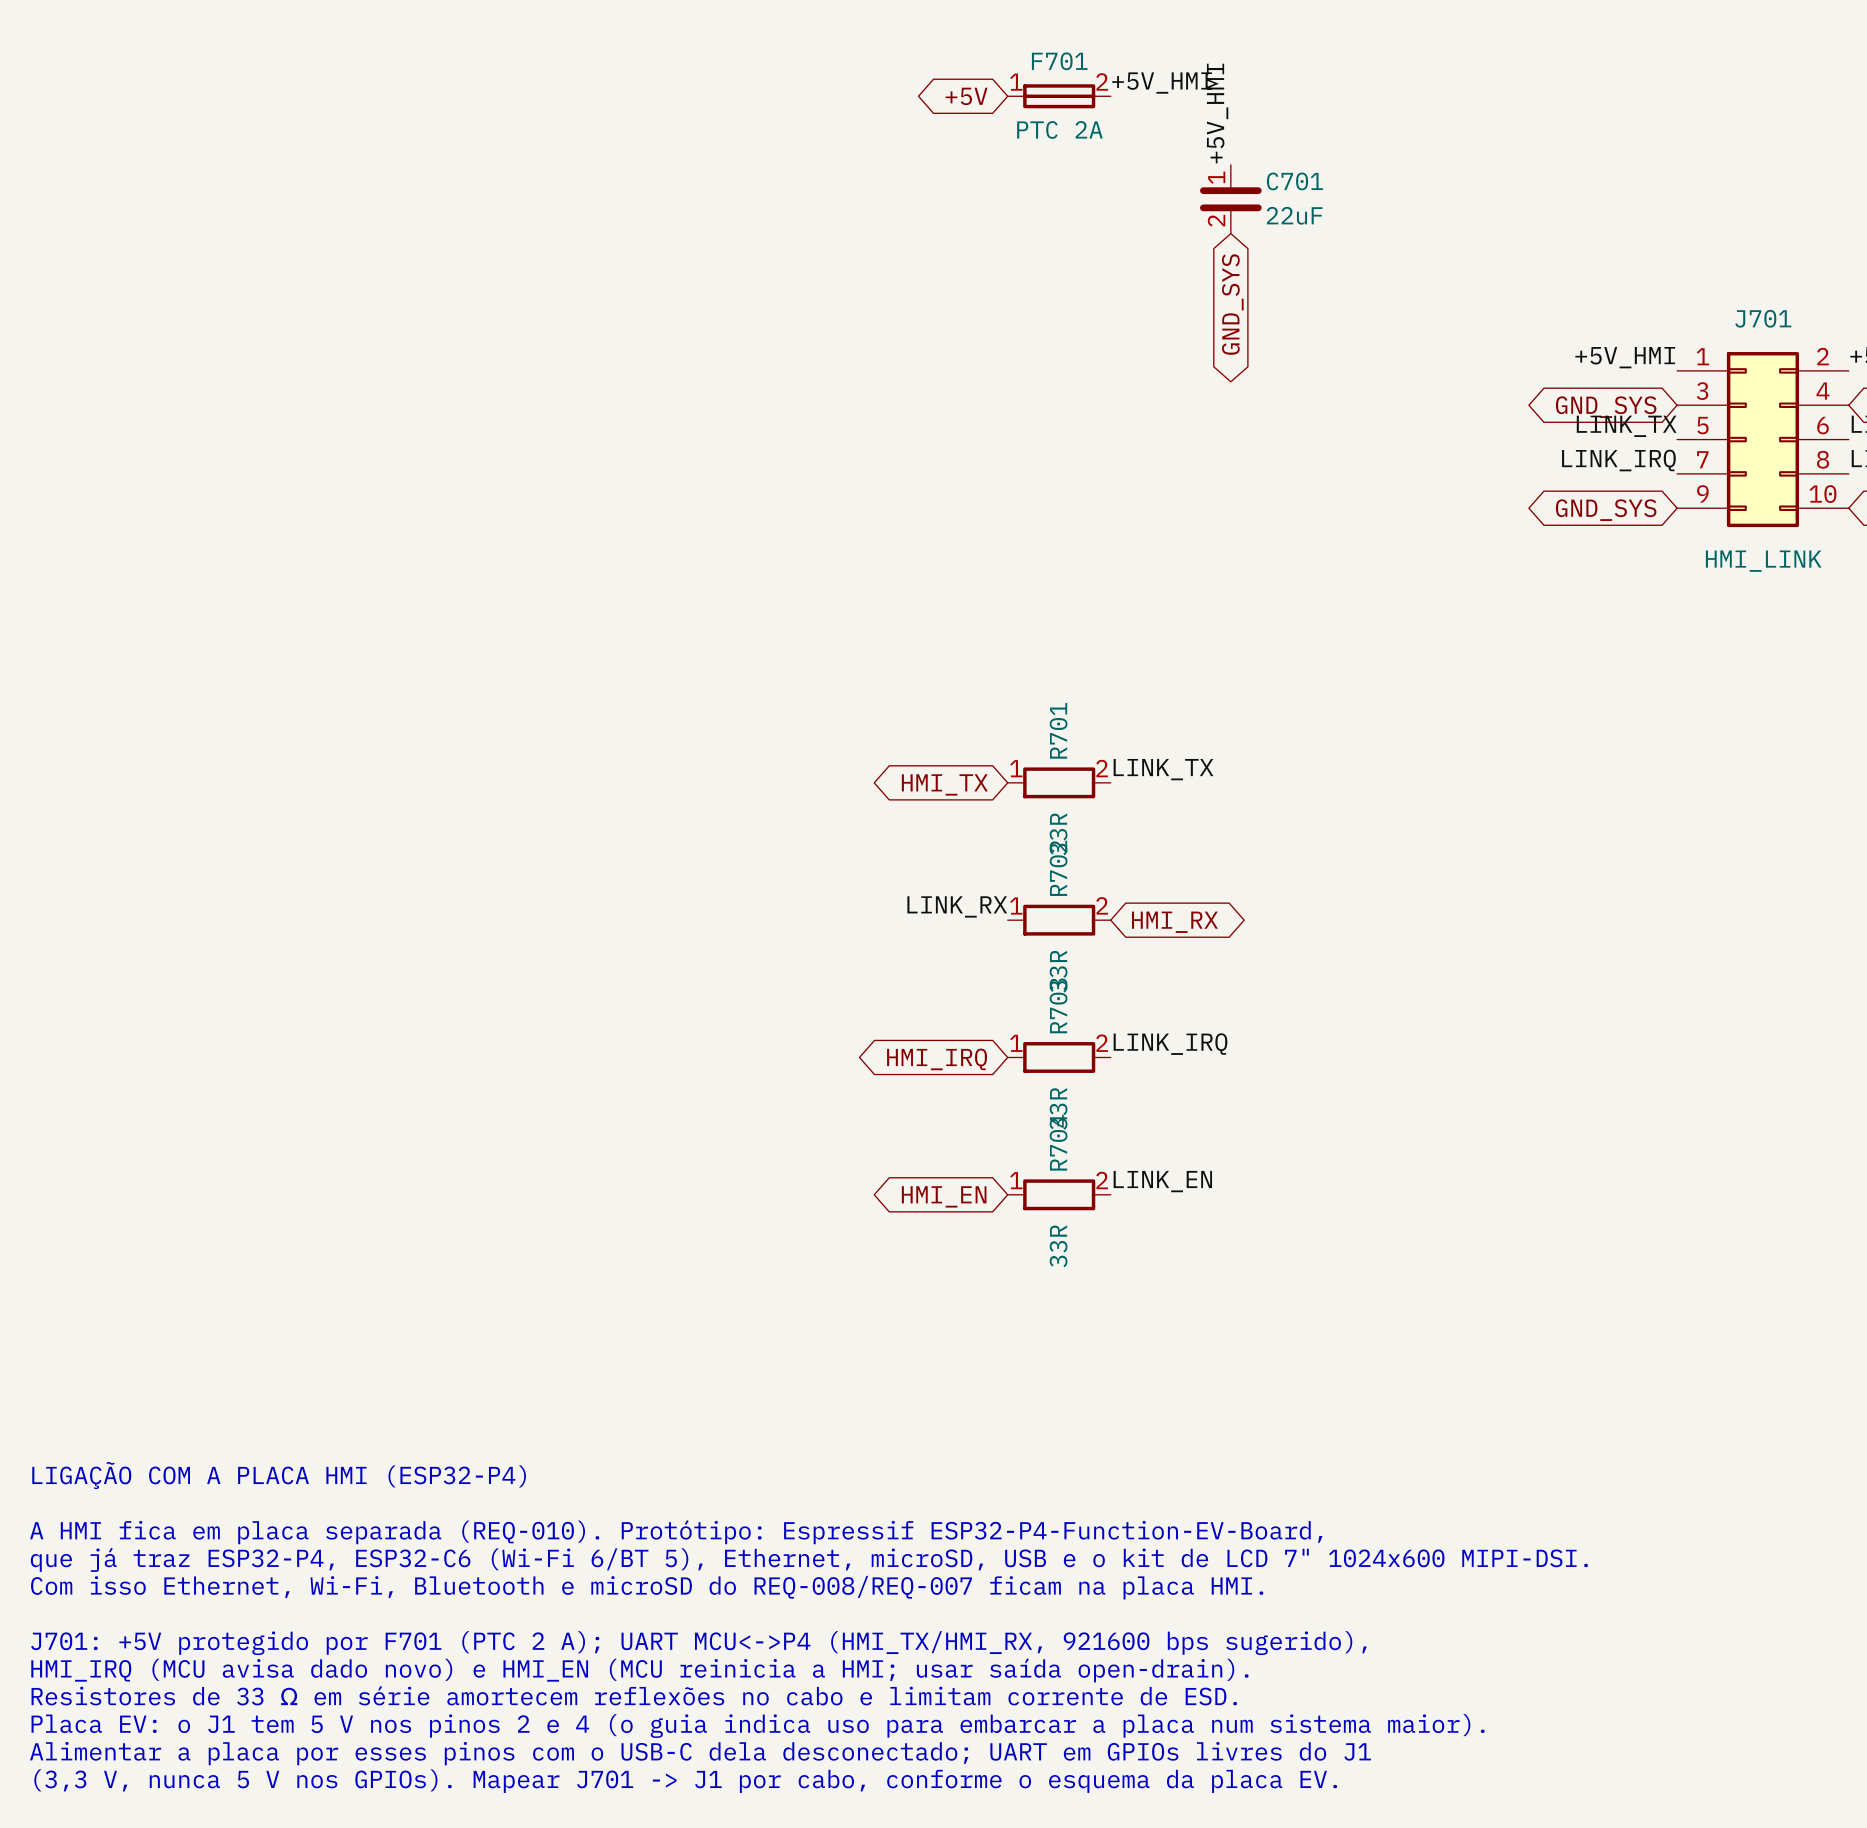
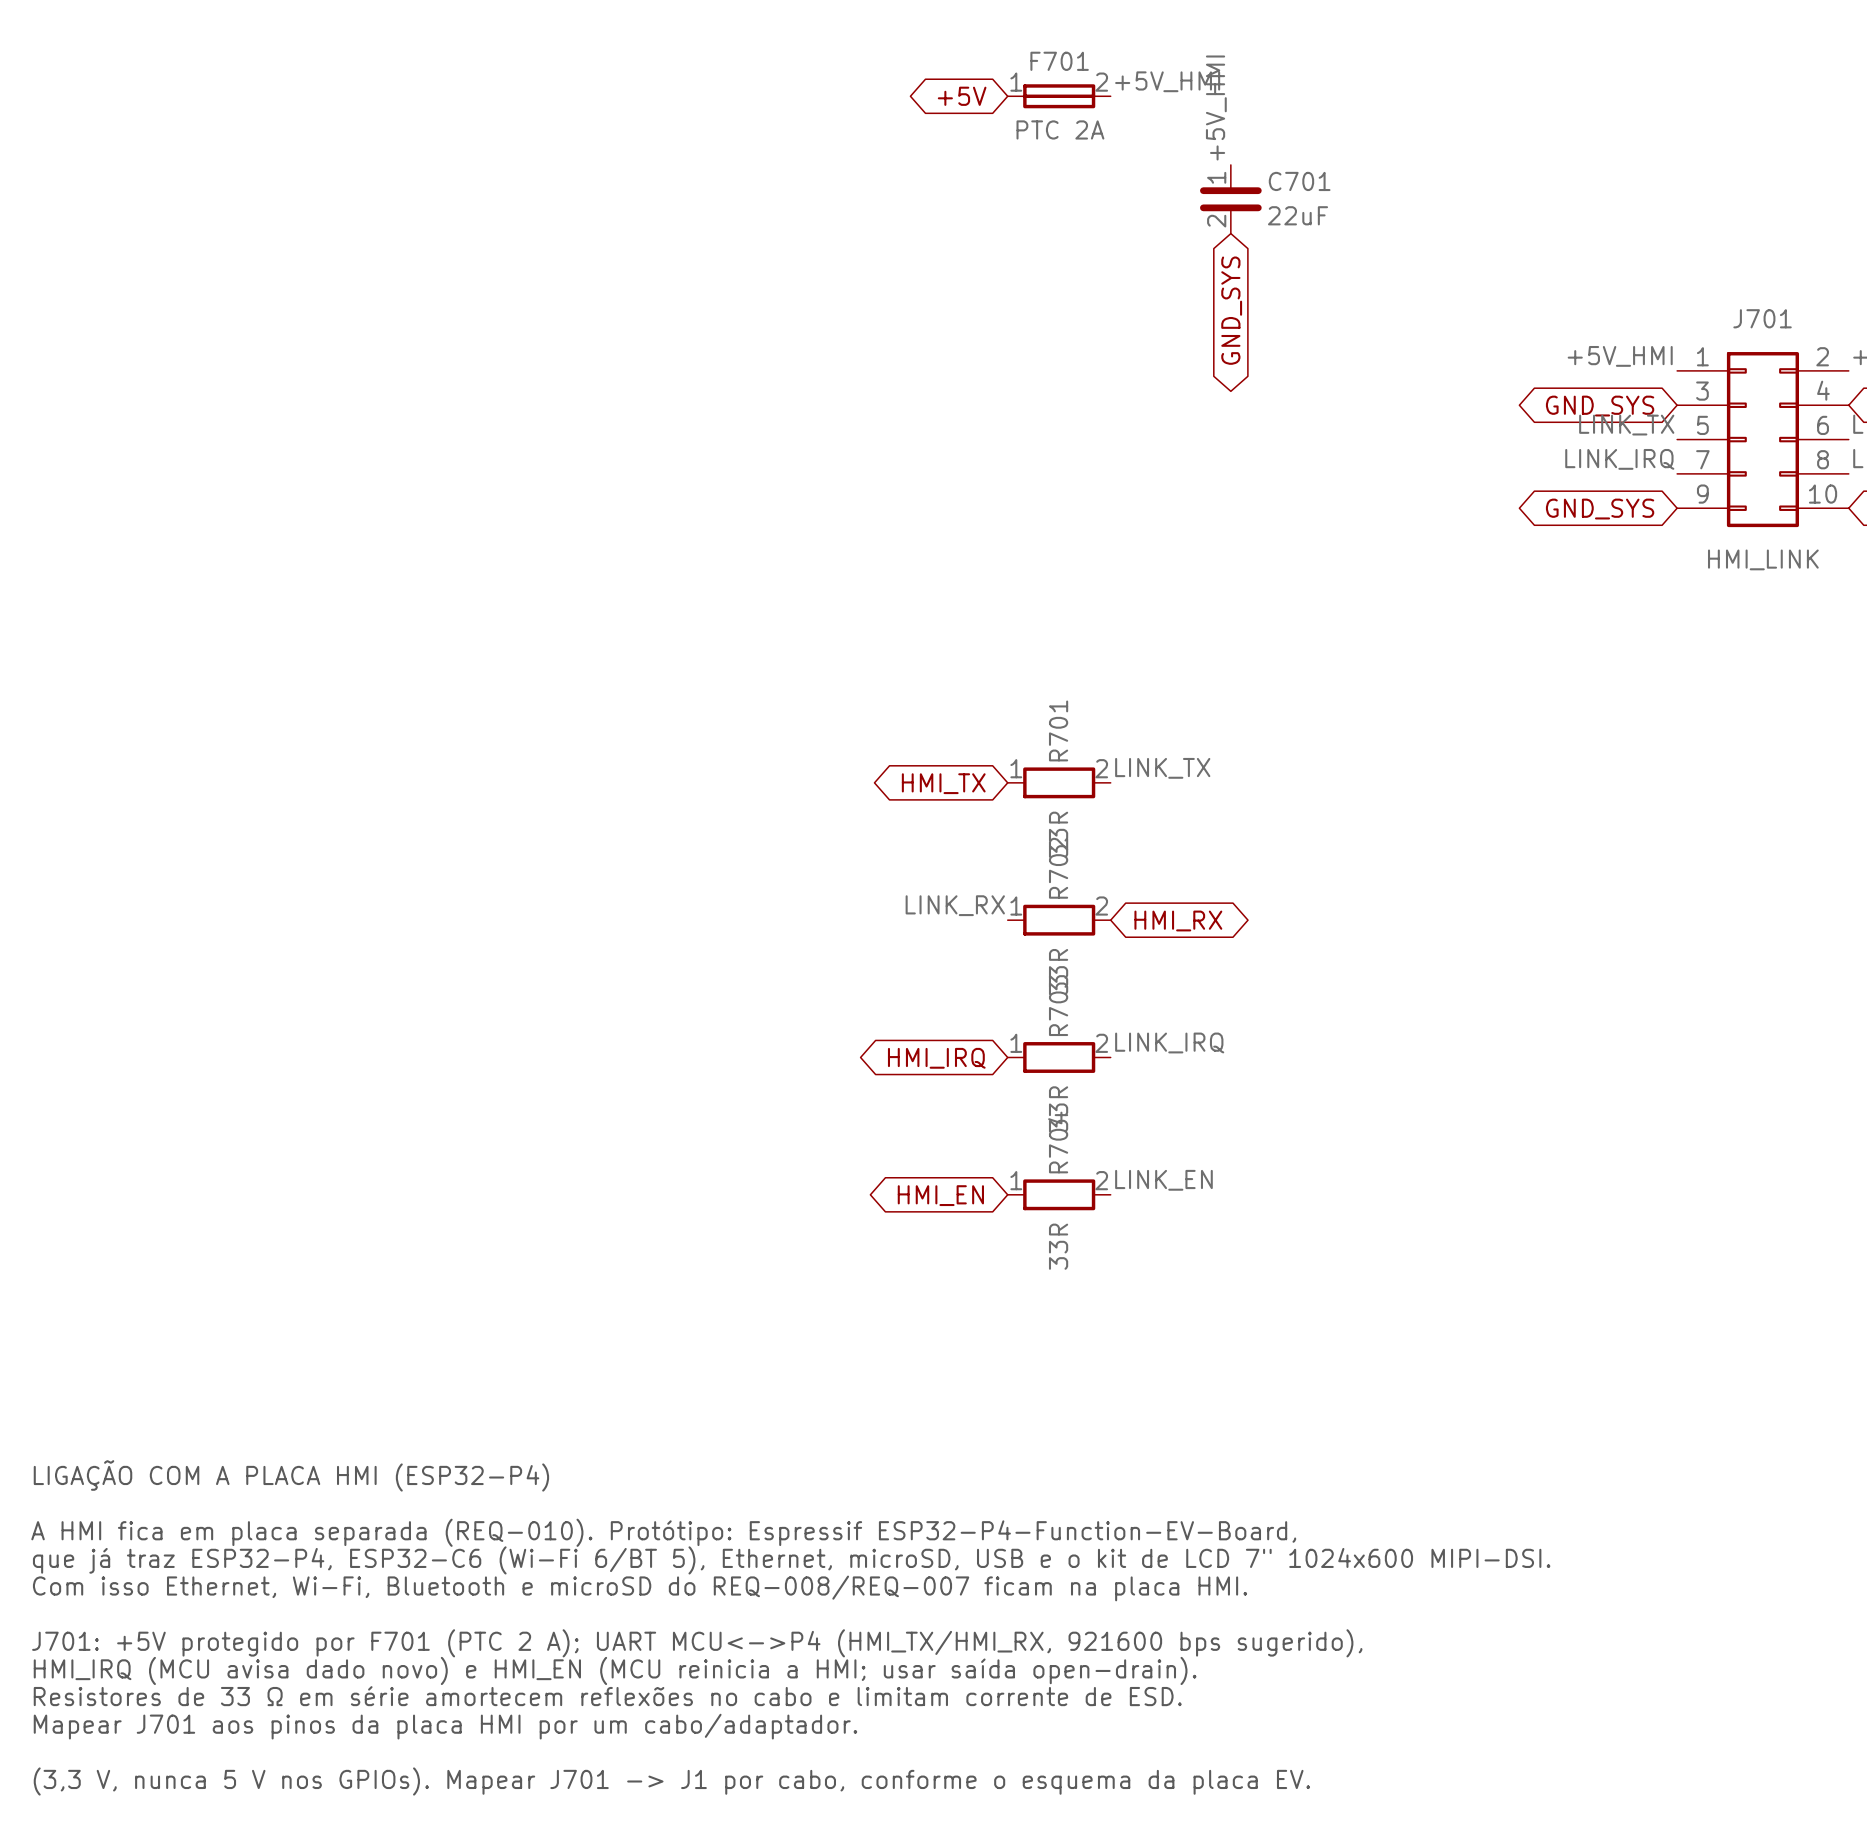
text: Placa EV: o J1 tem 5 V nos pinos 2 e 4 (o guia indica uso para embarcar a placa num sistema maior). (758, 1726) -> Mapear J701 aos pinos da placa HMI por um cabo/adaptador. (445, 1726)
text: Alimentar a placa por esses pinos com o USB-C dela desconectado; UART em GPIOs livres do J1 (700, 1753) -> none

